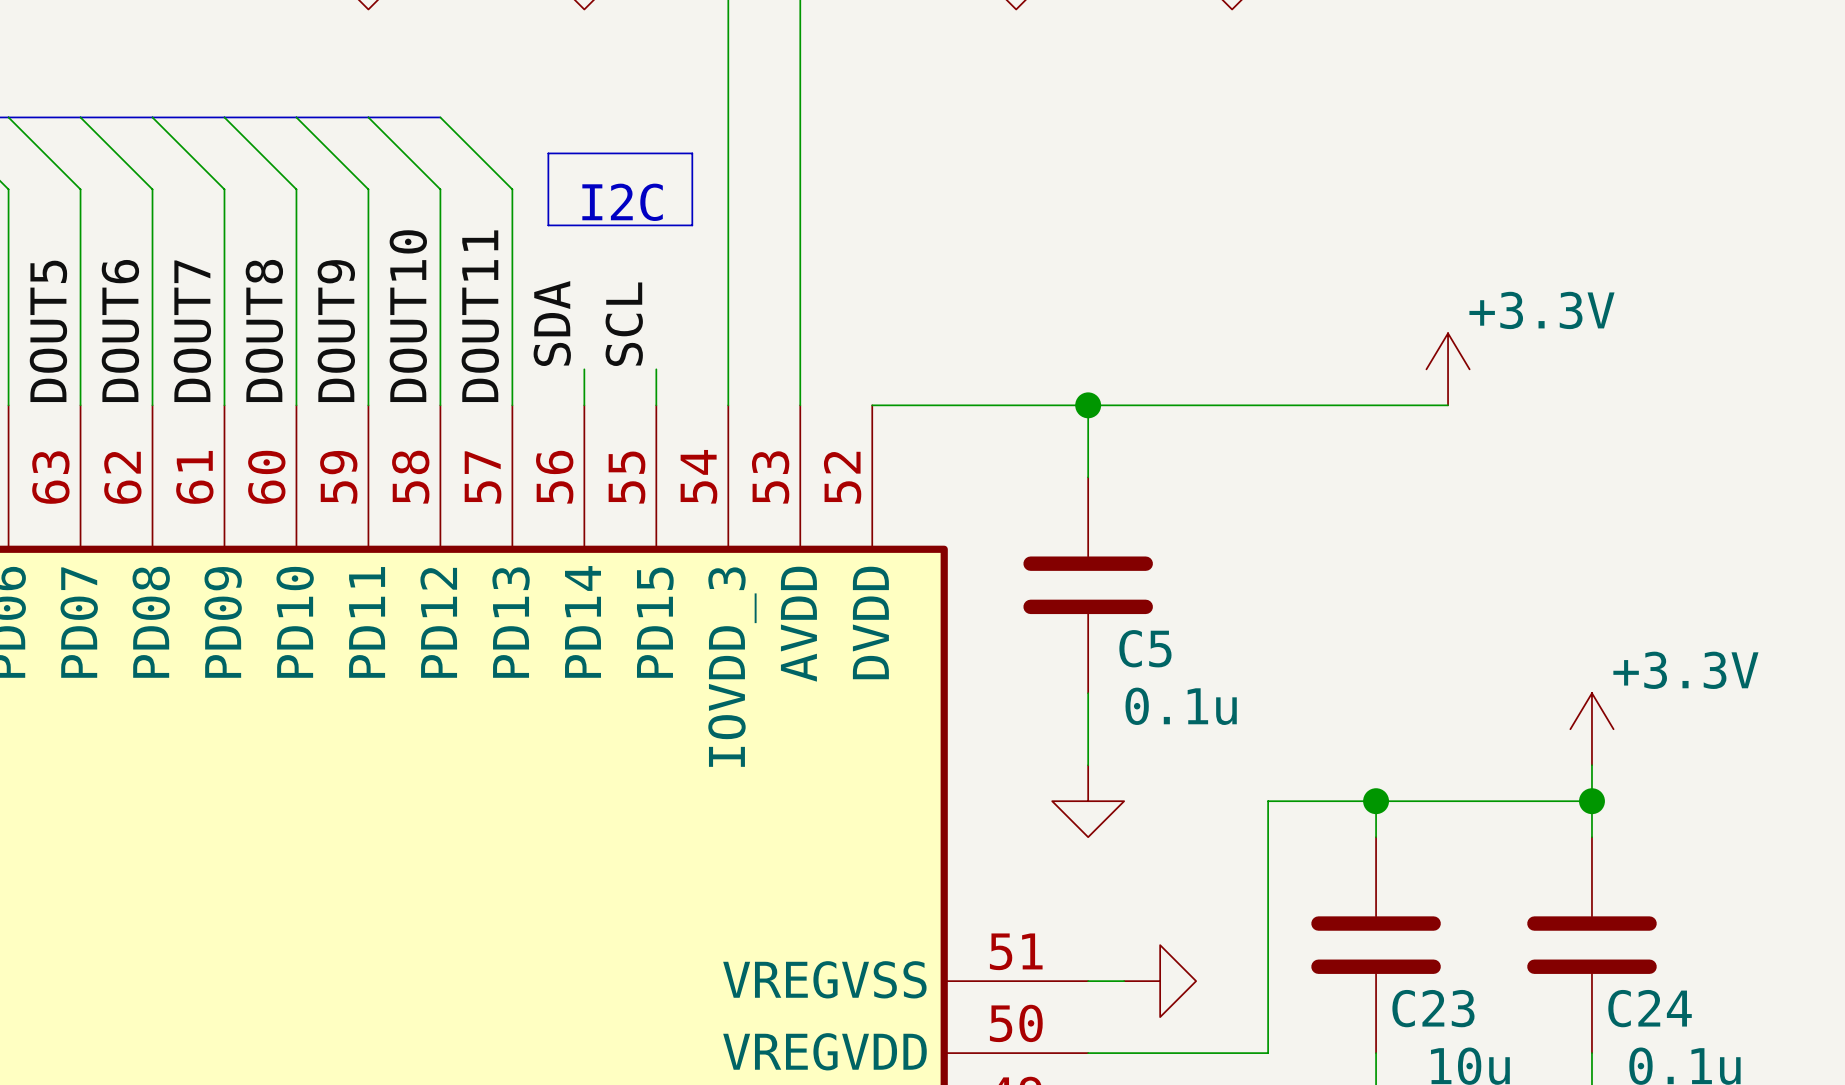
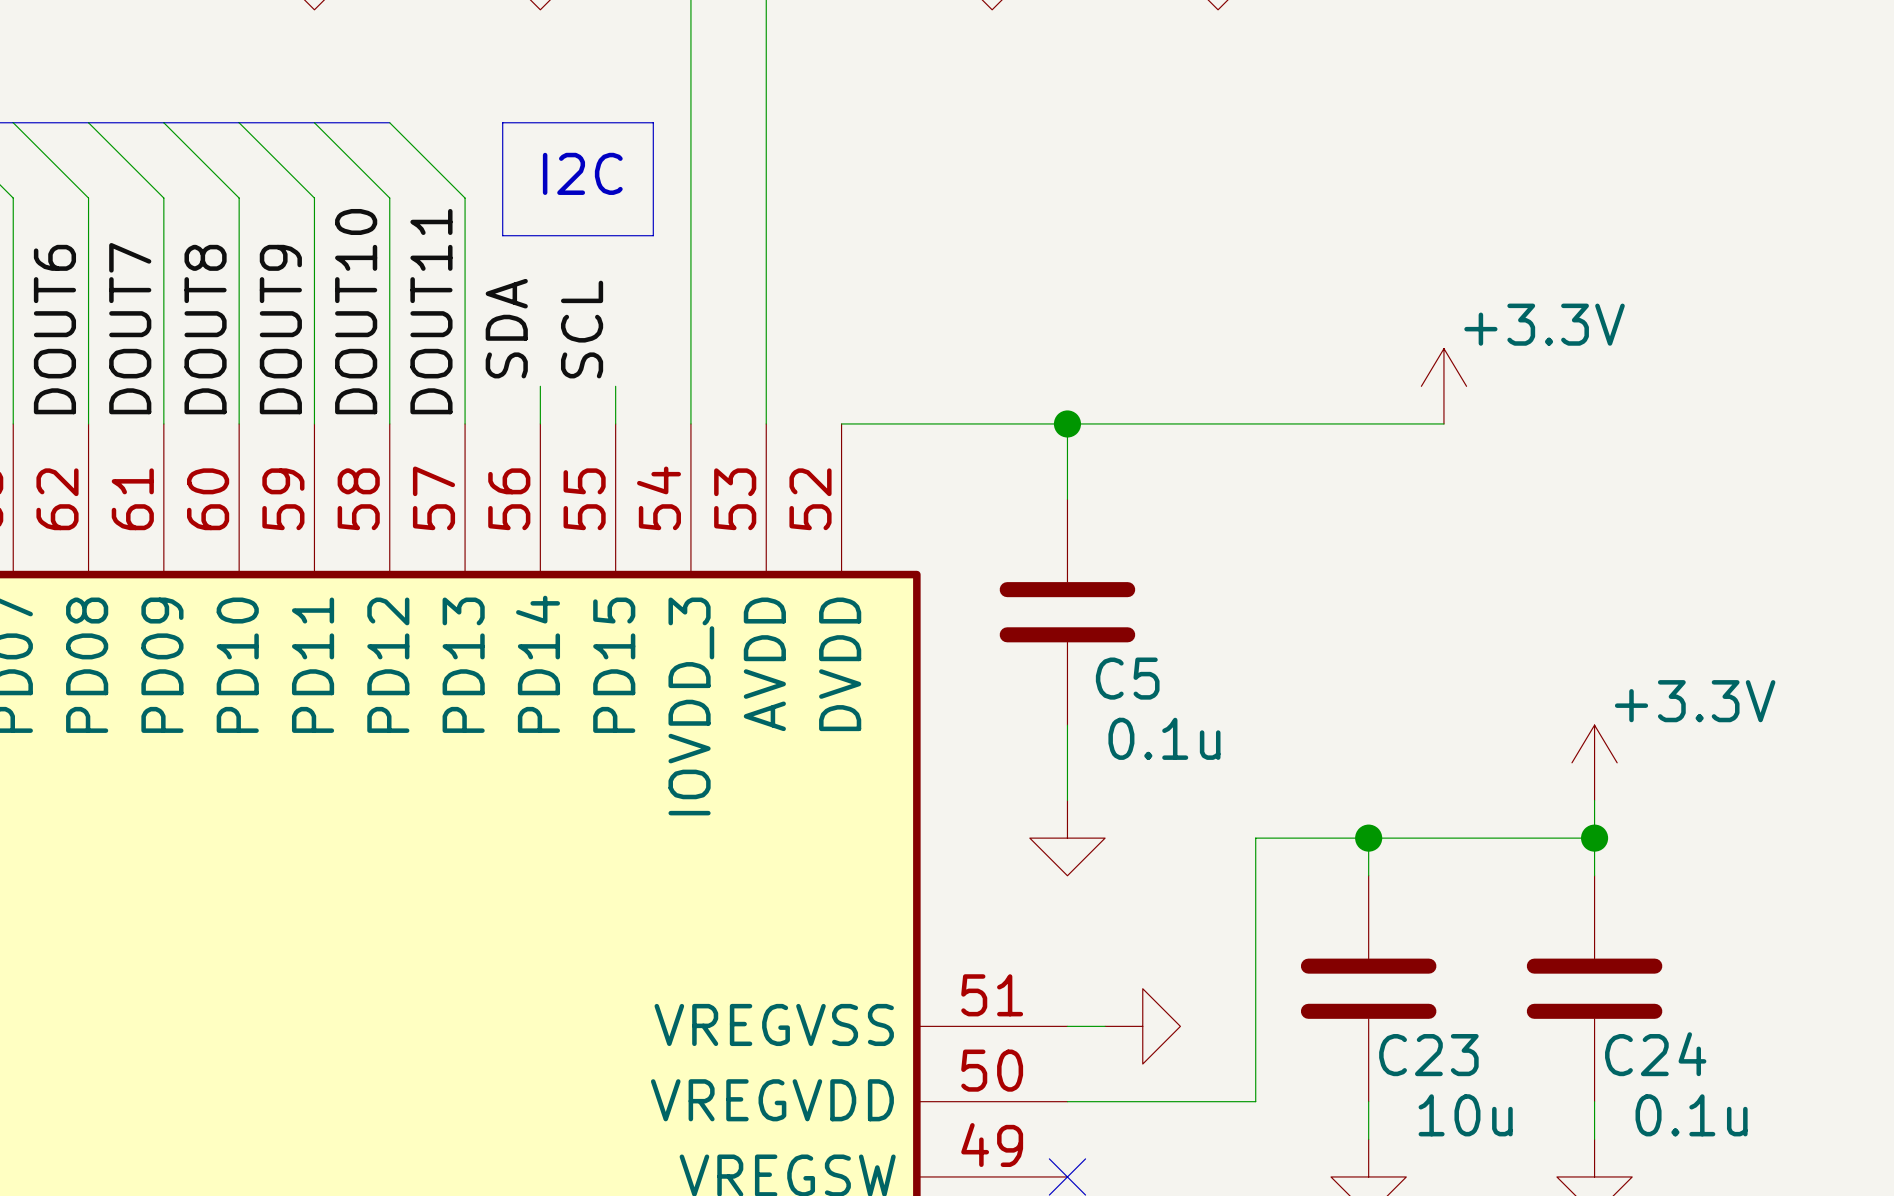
line: (548, 153) (692, 153) -> (502, 160) (502, 122) (653, 122) (653, 160)
text position: I2C (622, 202) -> I2C (582, 173)

